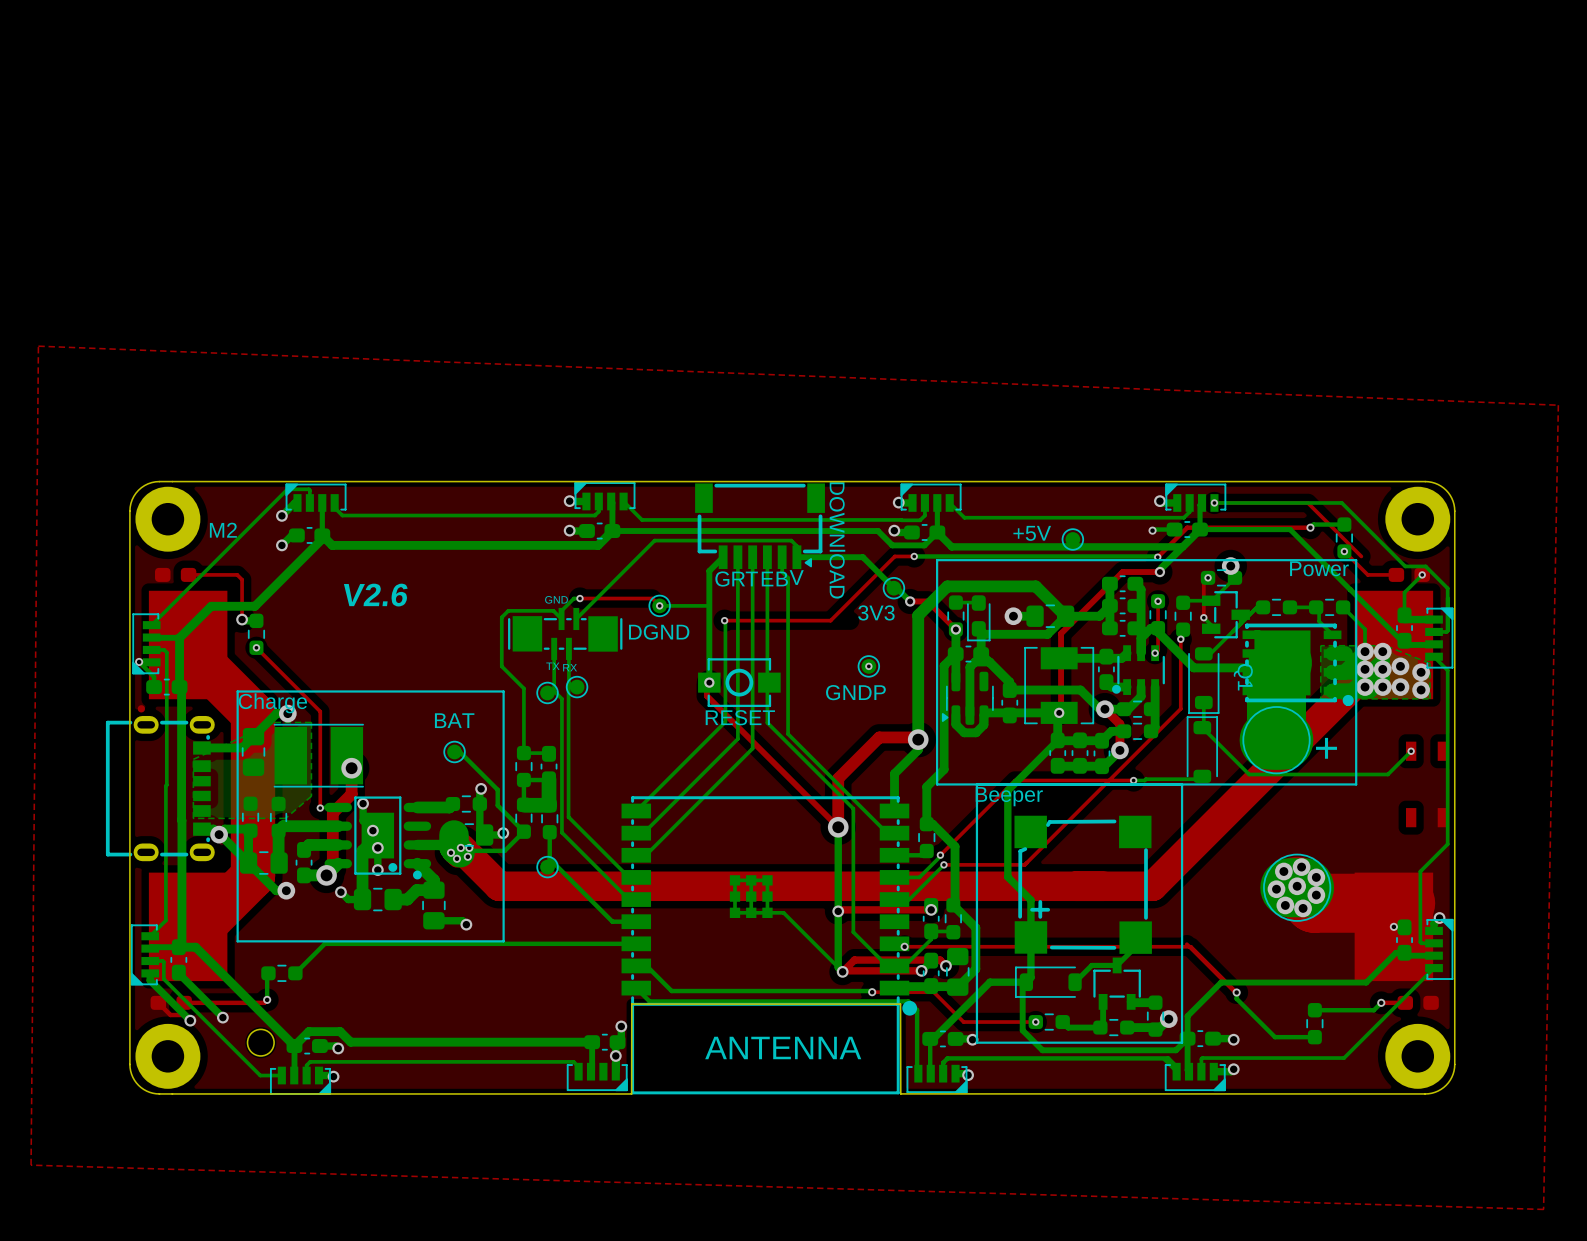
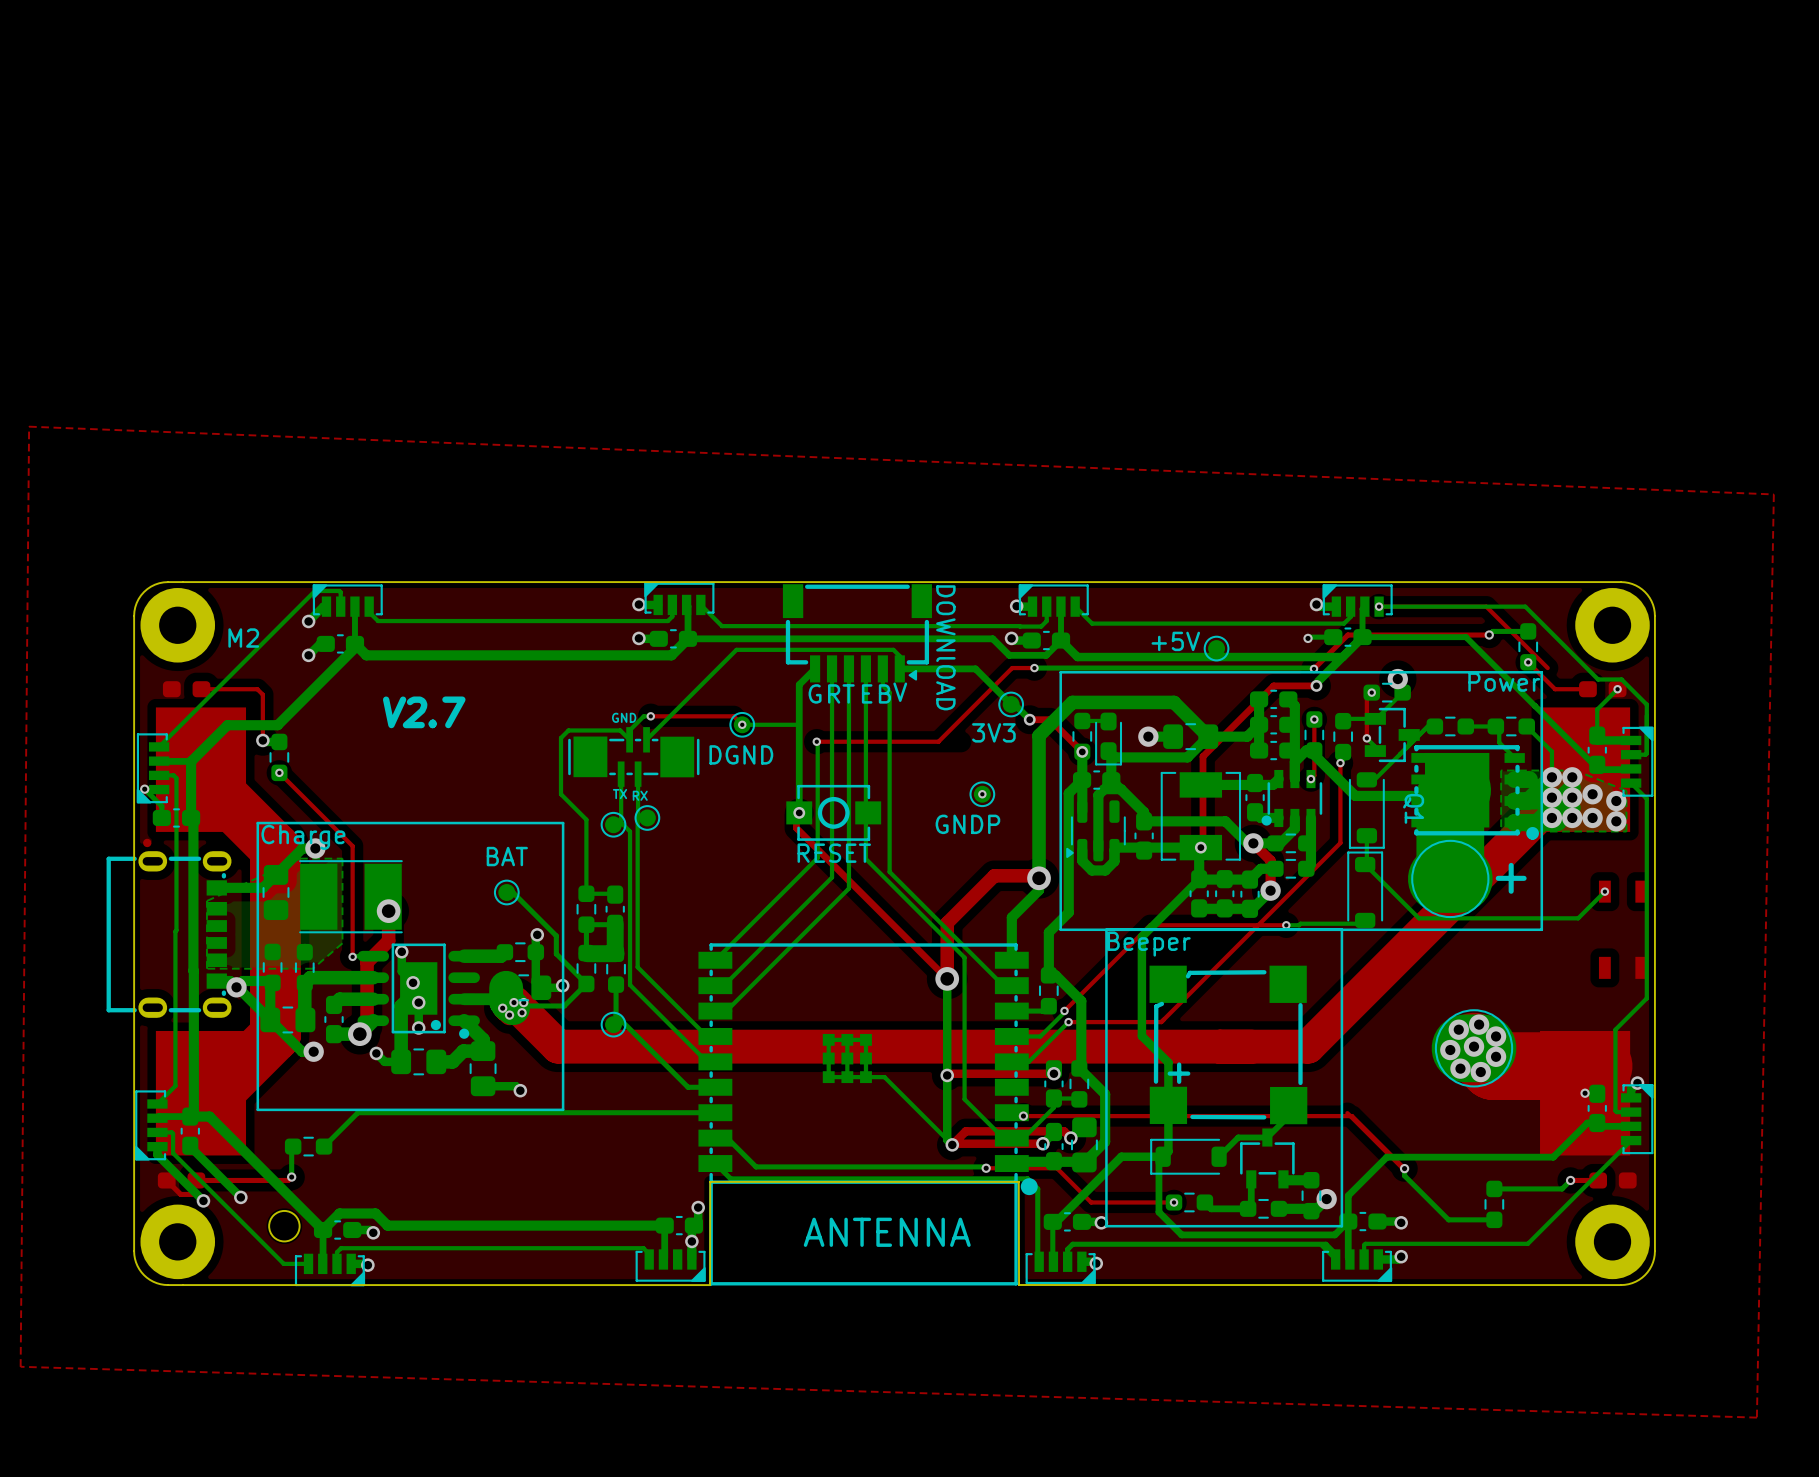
text: V2.6 (375, 595) -> V2.7 (424, 712)

